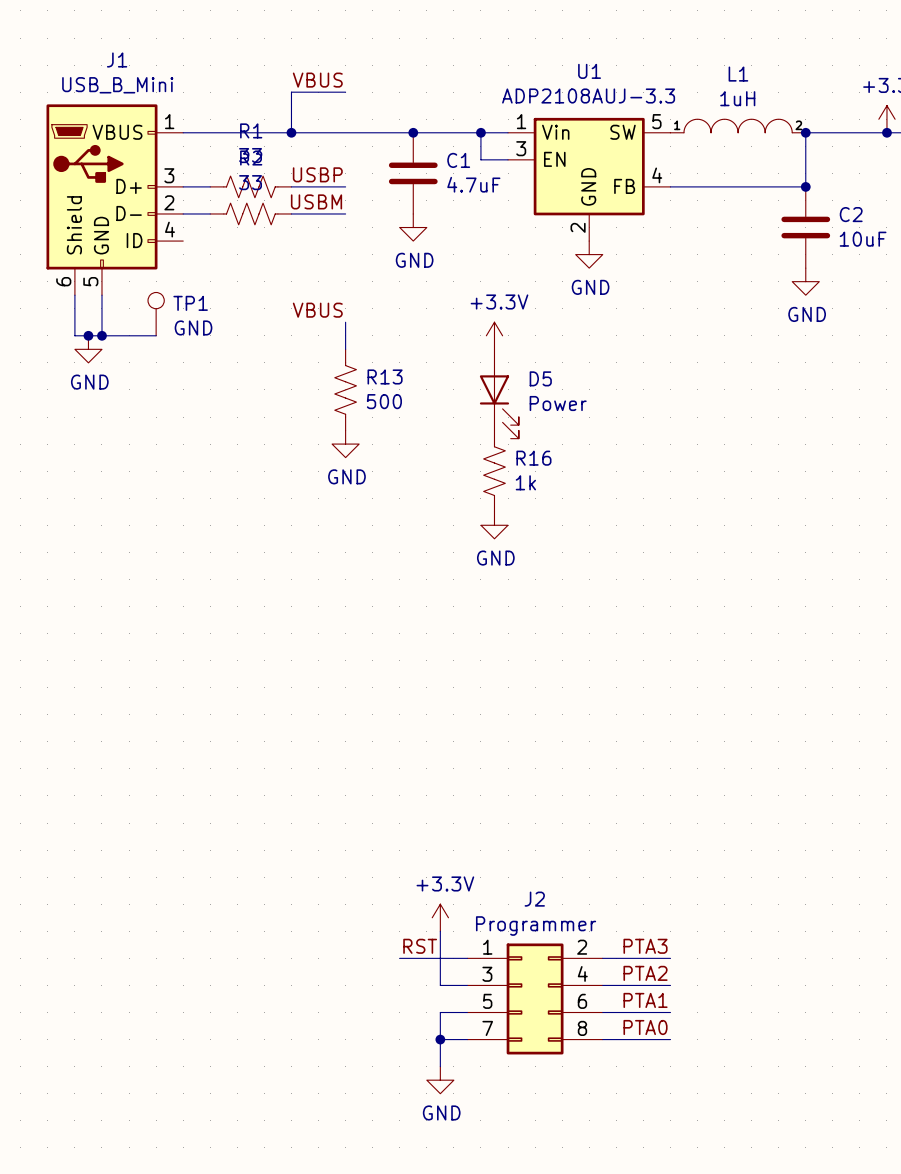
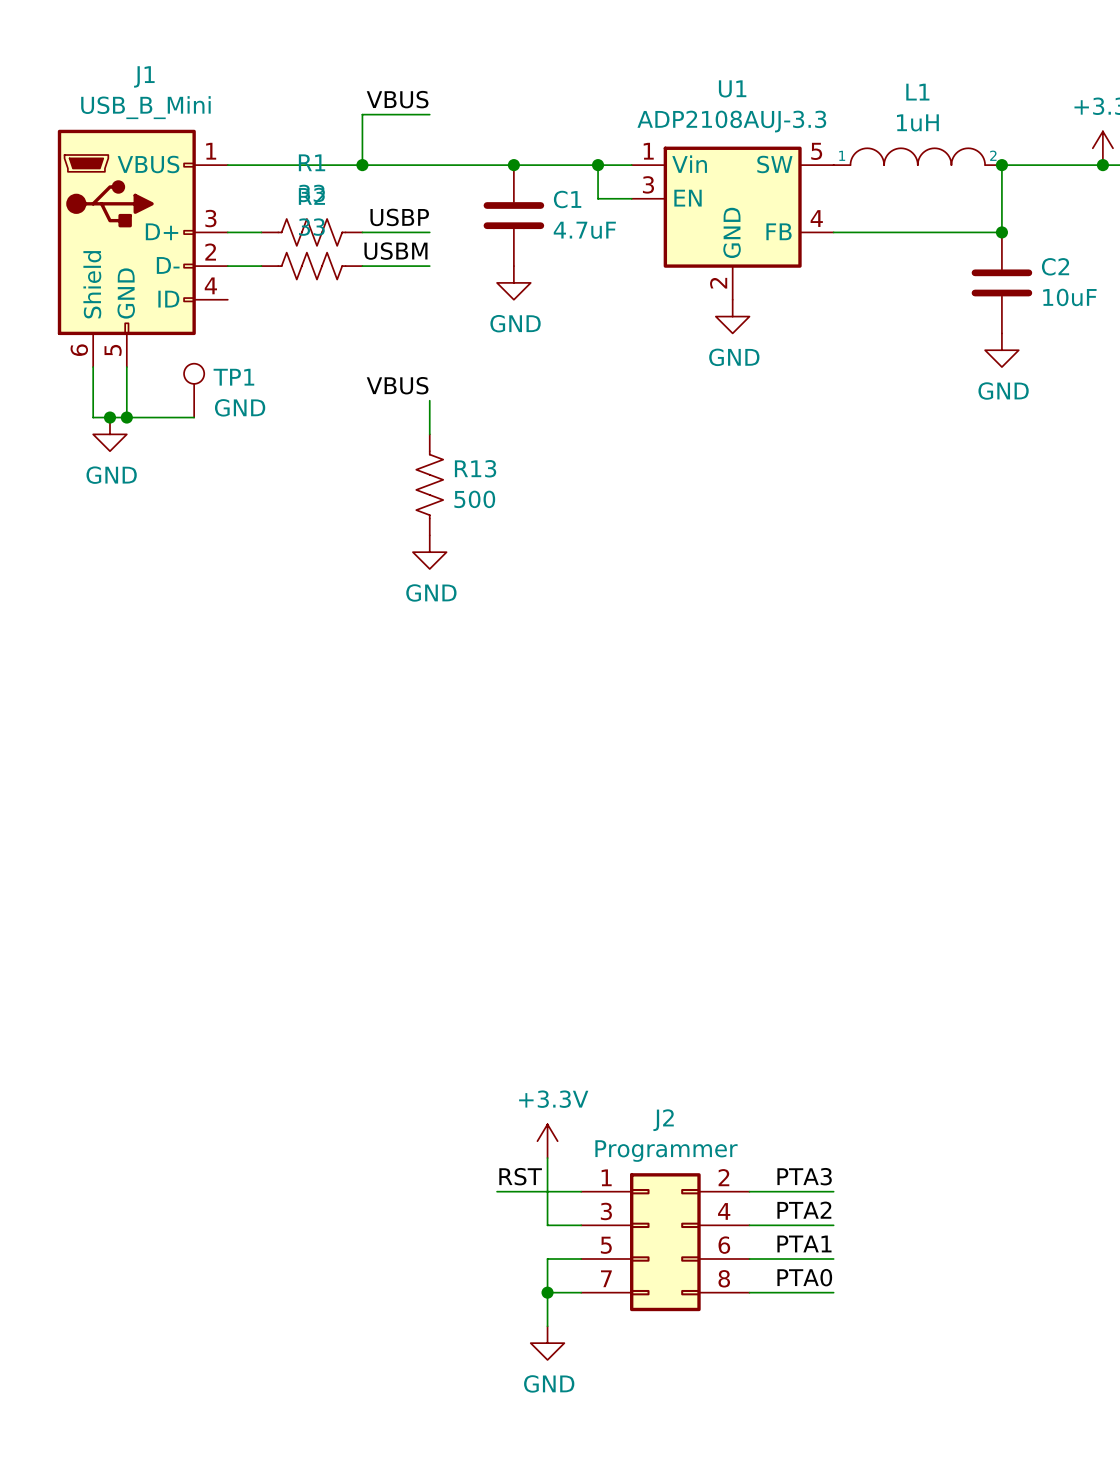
power symbol: +3.3V (494, 335) -> none
D5: Power (499, 393) -> none
R16: 1k (494, 471) -> none
power symbol: GND (494, 525) -> none

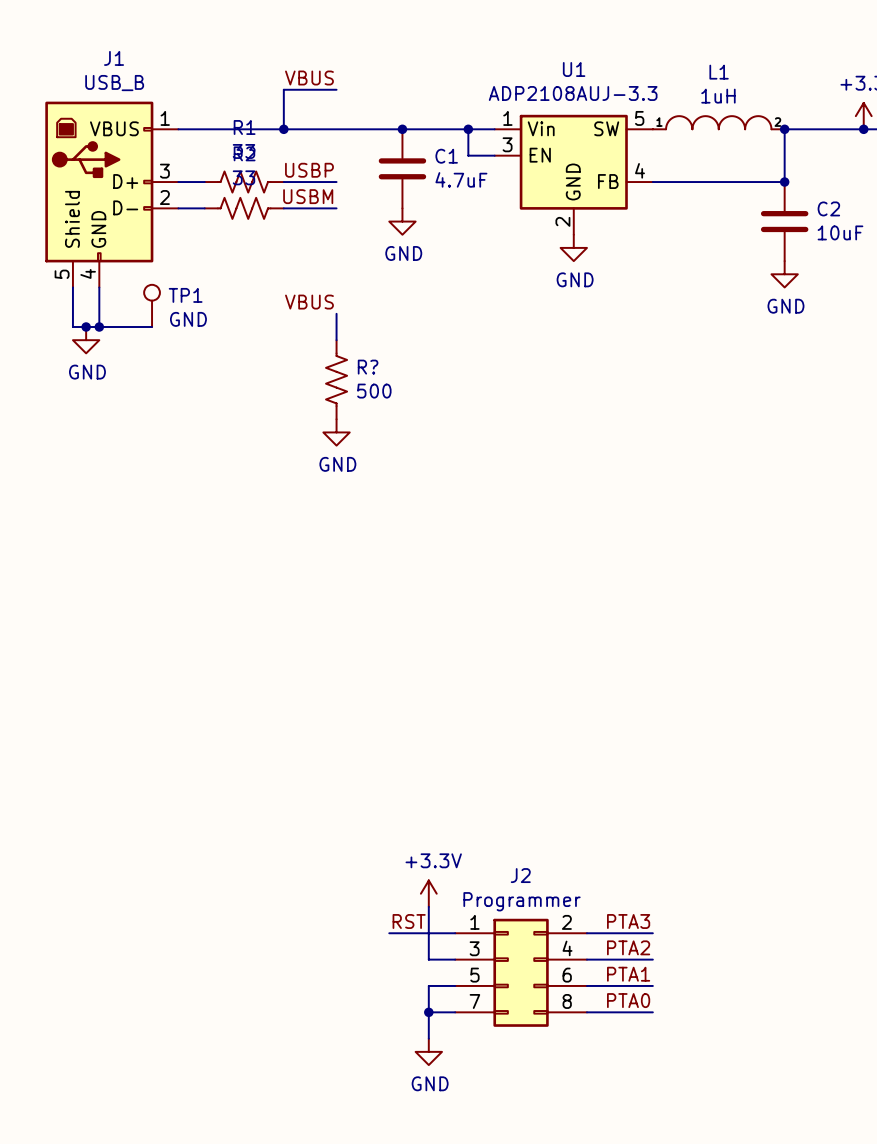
J1 value: USB_B_Mini (145, 107) -> USB_B (114, 83)
J1 symbol: [57, 129, 228, 368] -> [45, 101, 179, 288]
R13 name: R13 (475, 468) -> R? (368, 367)

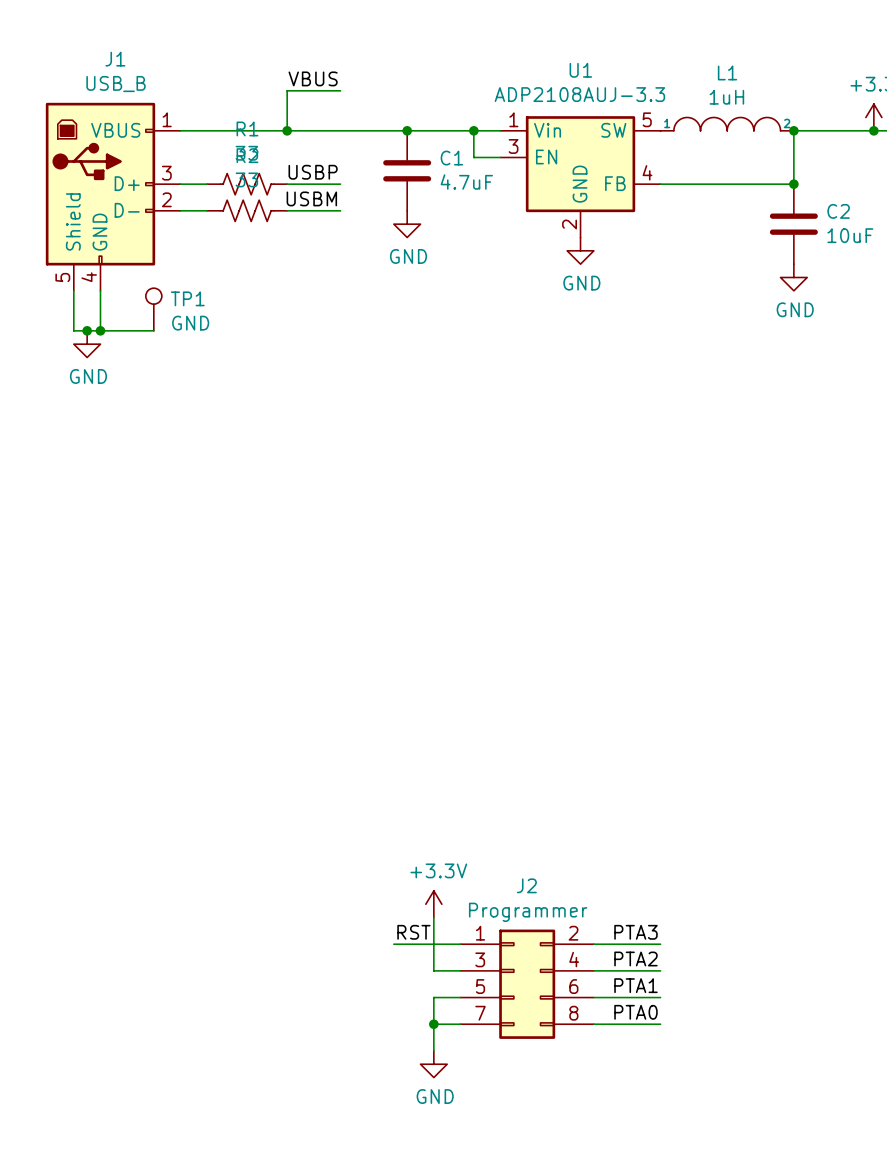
label: VBUS (309, 302) -> none
wire: (336, 313) (336, 340) -> none
R?: 500 (336, 379) -> none
power symbol: GND (336, 432) -> none

